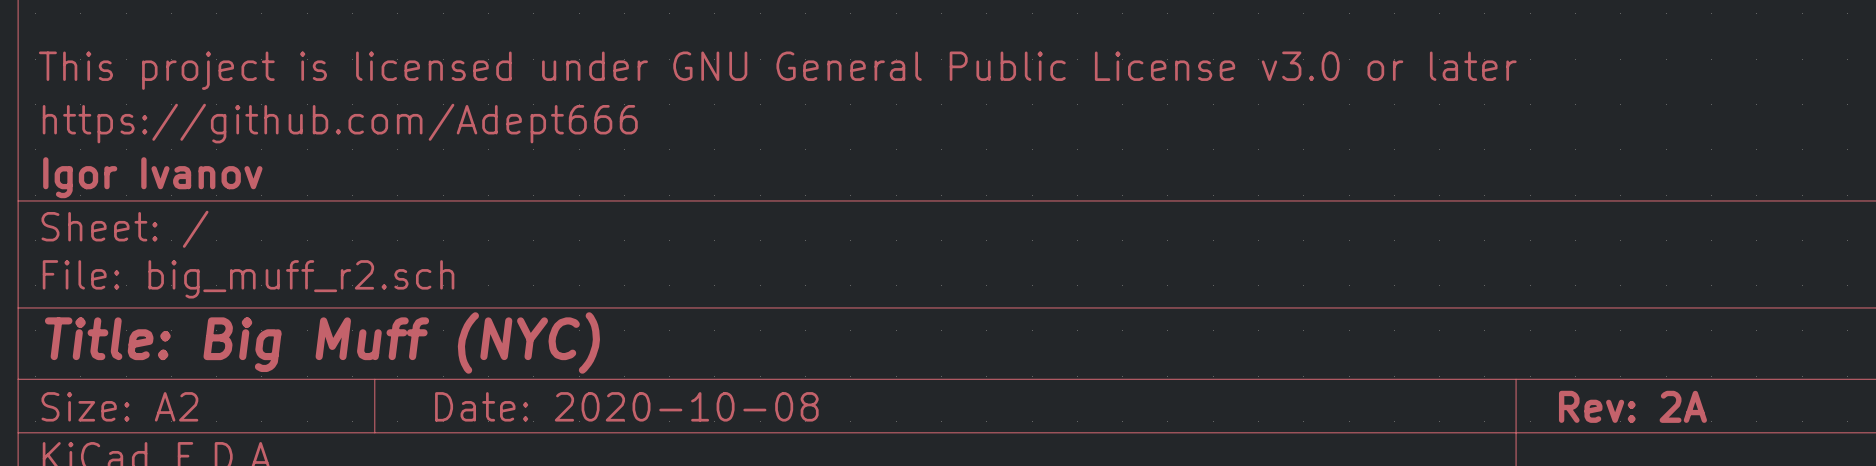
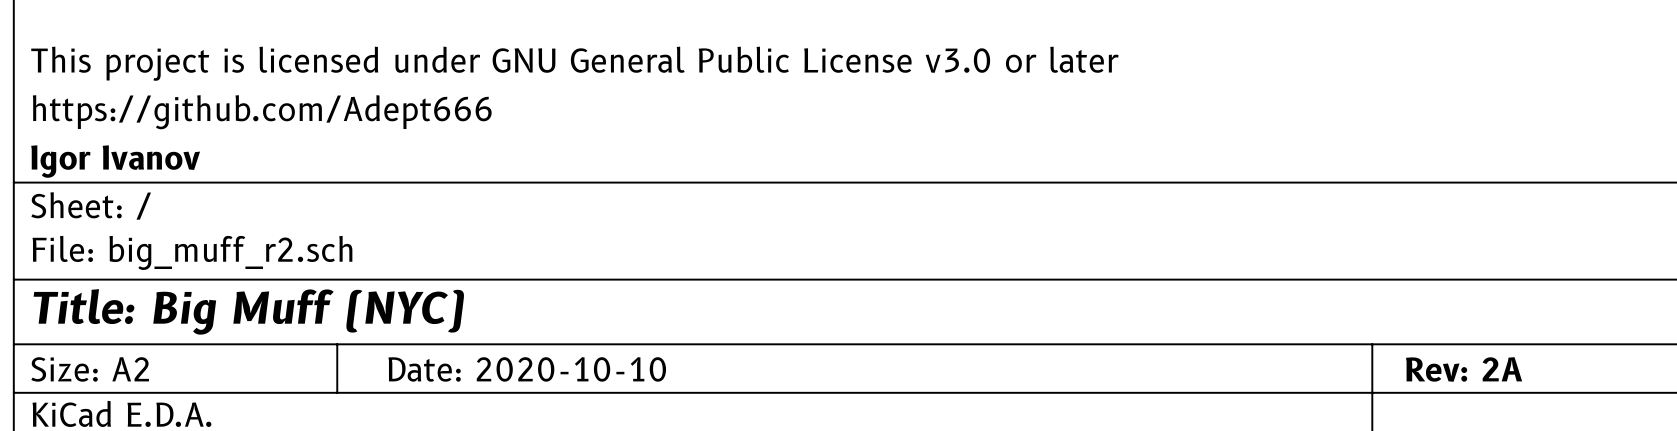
title block: Date: 2020-10-08 (626, 406) -> Date: 2020-10-10 (527, 369)

